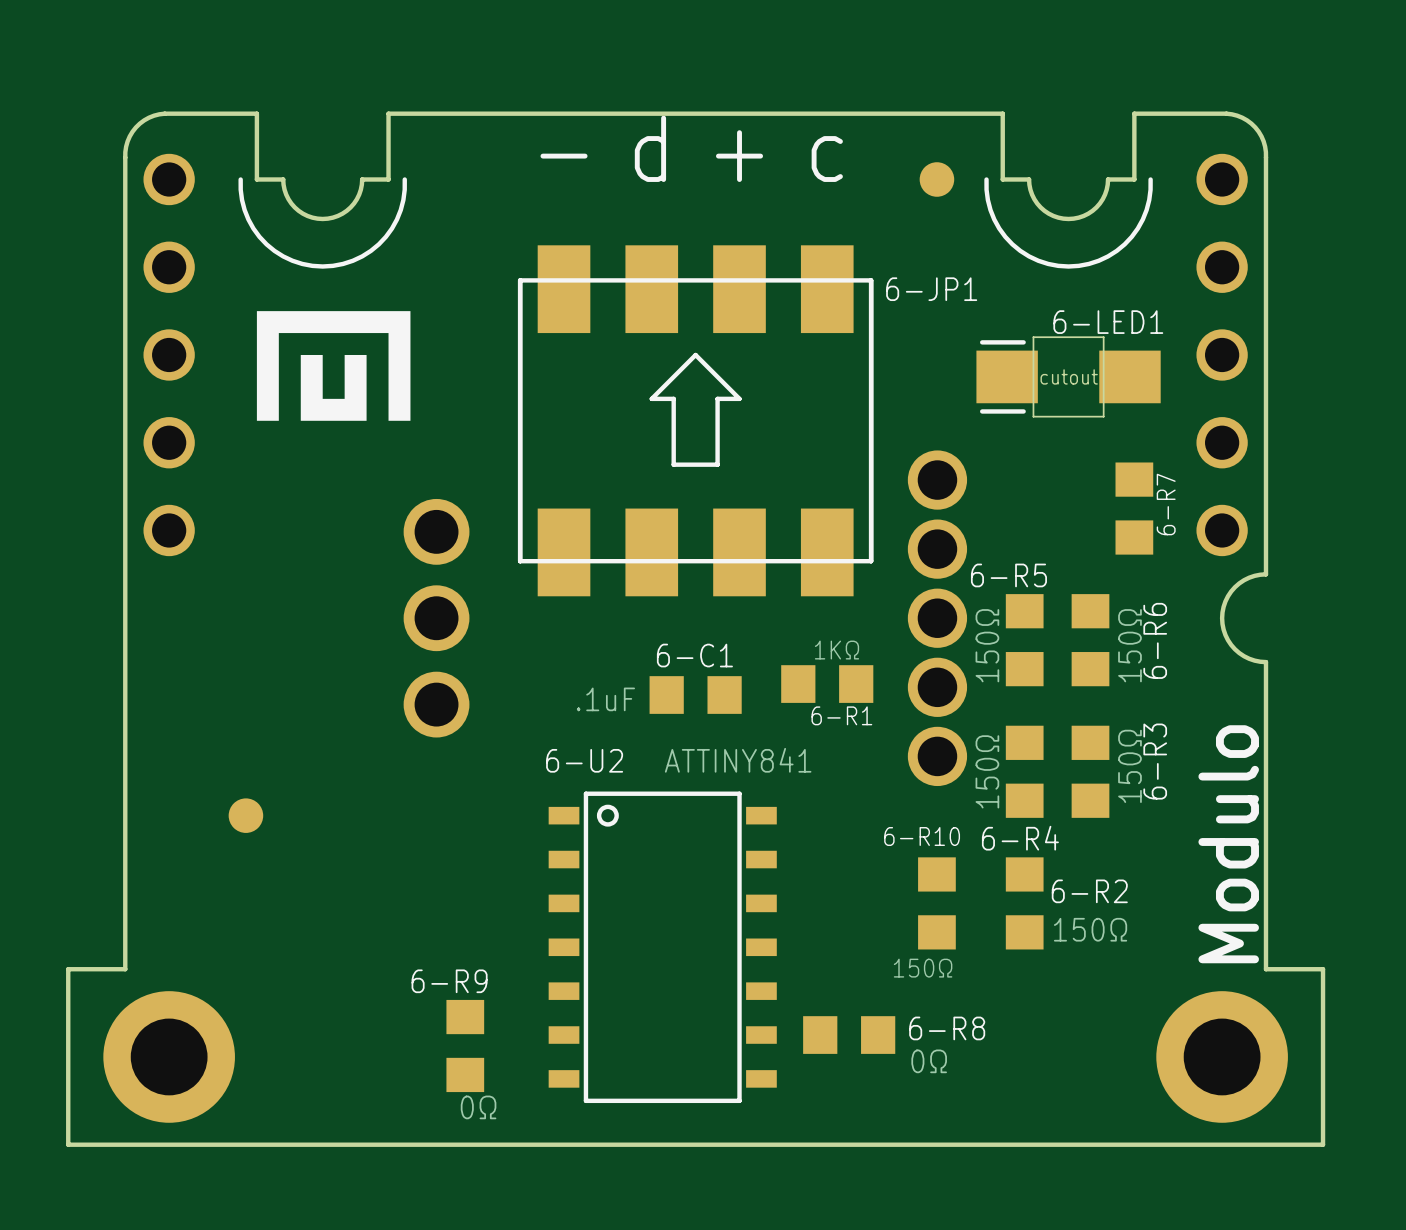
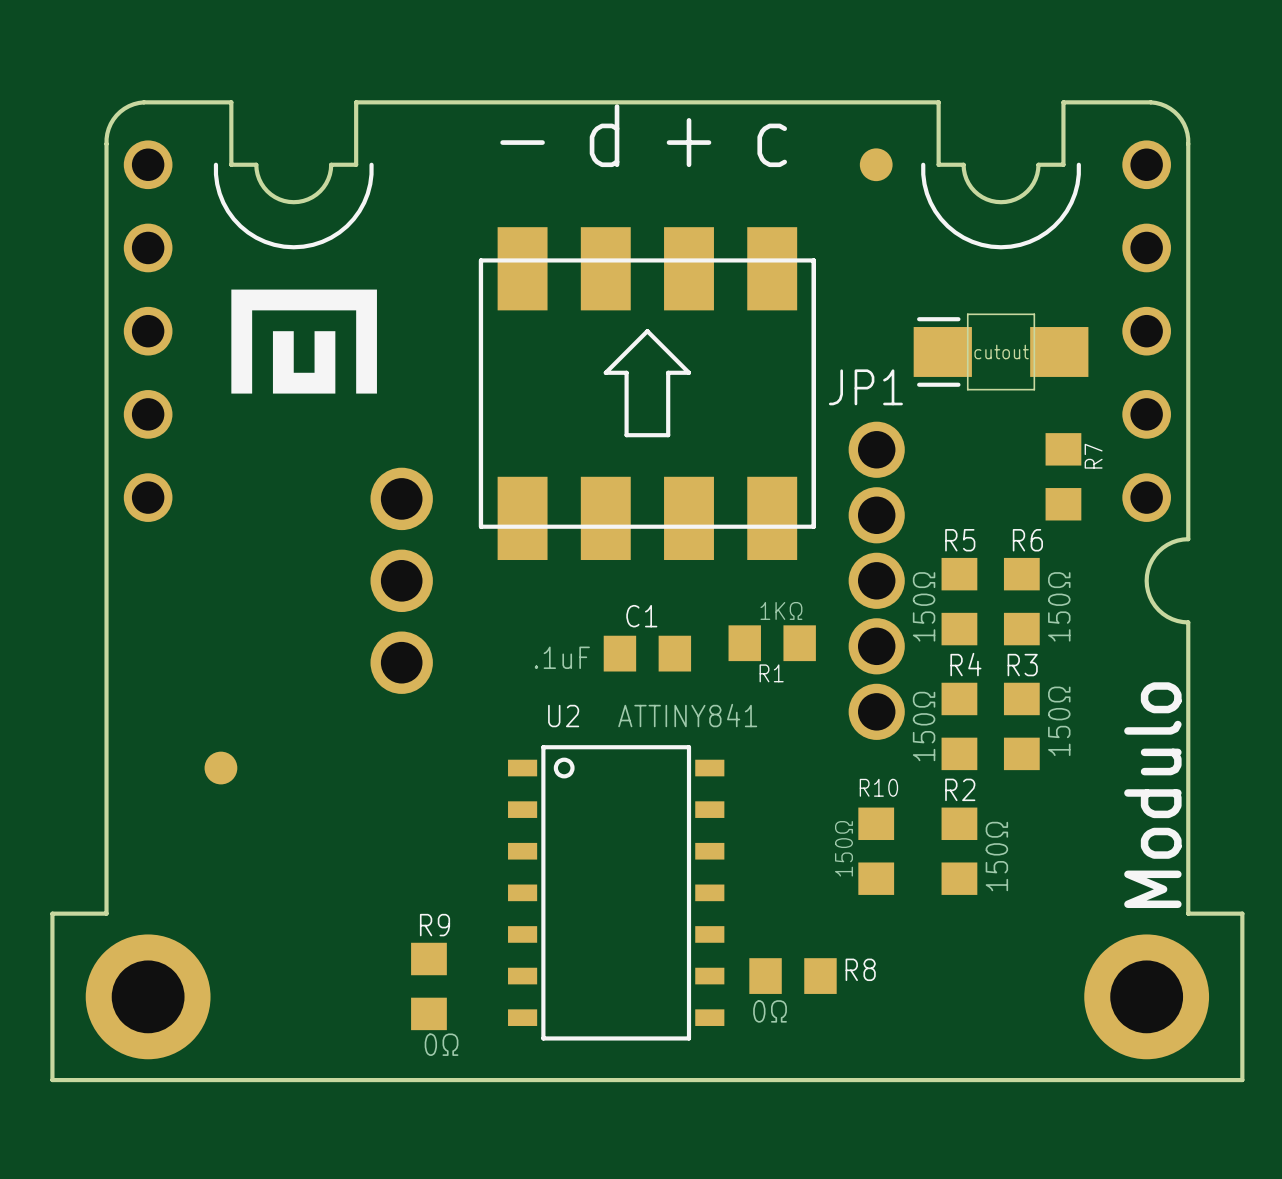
6-JP1 name: 6-JP1 (931, 289) -> JP1 (865, 387)
6-LED1 name: 6-LED1 (1108, 322) -> none
6-R7 name: 6-R7 (1166, 504) -> R7 (1093, 456)
6-R5 name: 6-R5 (1008, 575) -> R5 (960, 540)
6-R6 name: 6-R6 (1155, 640) -> R6 (1027, 540)
6-C1 name: 6-C1 (694, 655) -> C1 (641, 616)
6-R1 name: 6-R1 (841, 715) -> R1 (771, 673)
6-U2 name: 6-U2 (584, 760) -> U2 (563, 716)
6-R3 name: 6-R3 (1155, 761) -> R3 (1022, 665)
6-R10 name: 6-R10 (922, 836) -> R10 (878, 787)
6-R4 name: 6-R4 (1020, 838) -> R4 (965, 664)
6-R2 name: 6-R2 (1089, 891) -> R2 (960, 789)
6-R2 value rotation: 0° (1090, 929) -> 90° counterclockwise (996, 856)
6-R10 value rotation: 0° (923, 968) -> 90° counterclockwise (843, 848)
6-R9 name: 6-R9 (449, 981) -> R9 (435, 925)
6-R8 name: 6-R8 (947, 1028) -> R8 (860, 969)
6-R8 value position: 0Ω (929, 1061) -> 0Ω (770, 1011)

